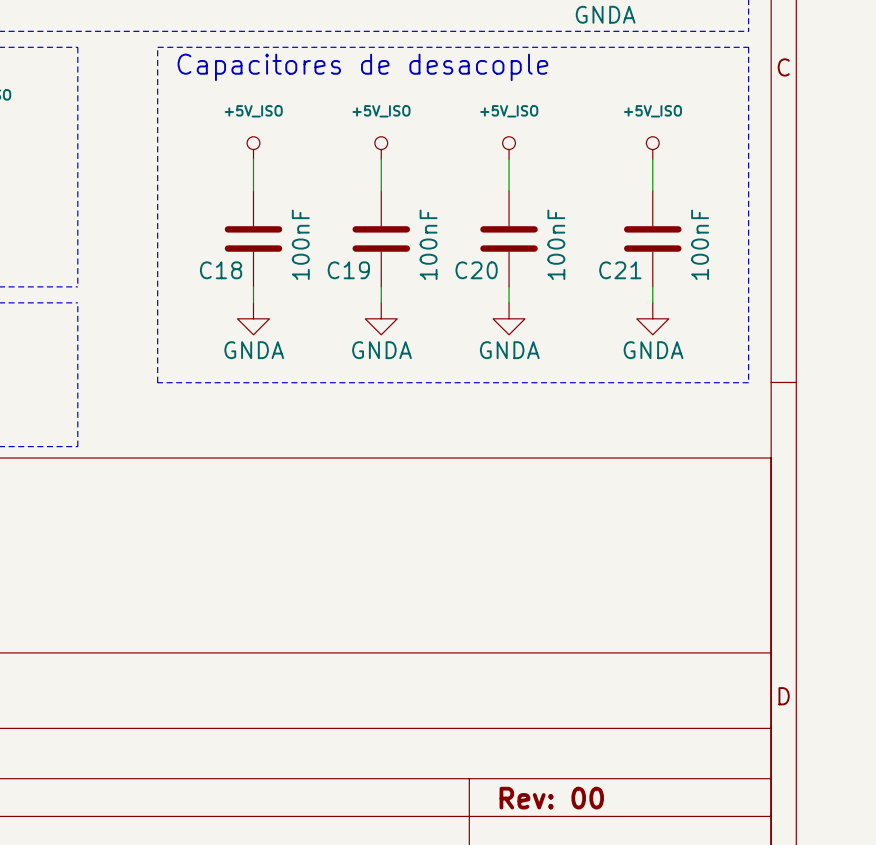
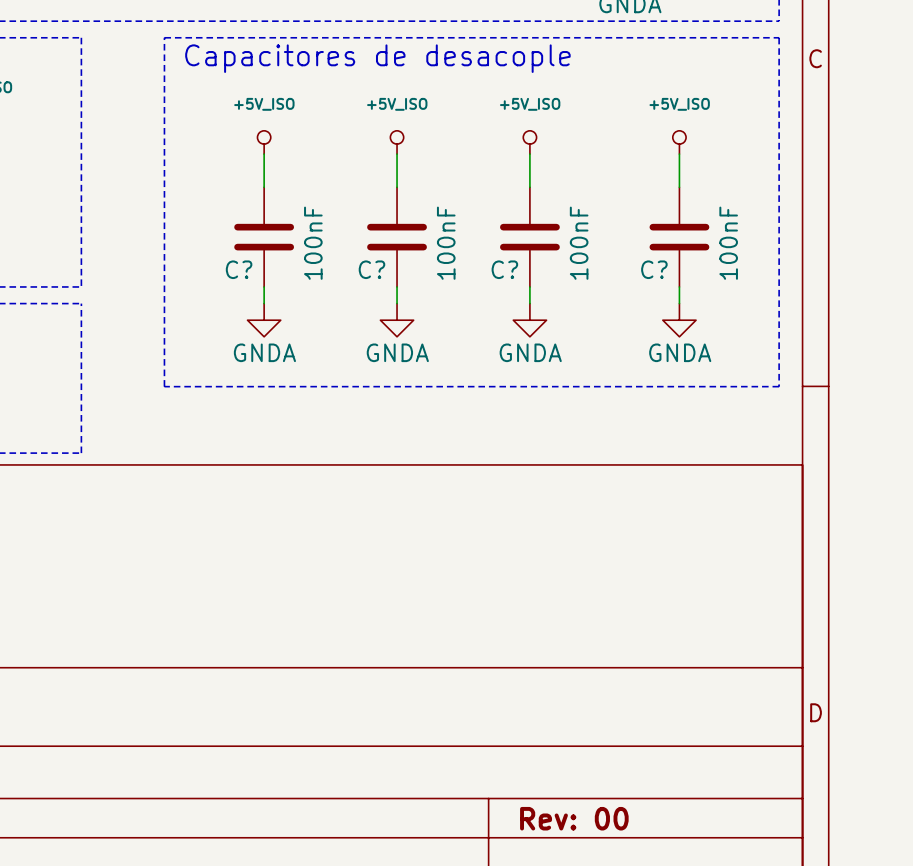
C18 name: C18 (221, 270) -> C? (239, 269)
C19 name: C19 (348, 270) -> C? (371, 269)
C20 name: C20 (476, 270) -> C? (504, 269)
C21 name: C21 (620, 270) -> C? (654, 269)

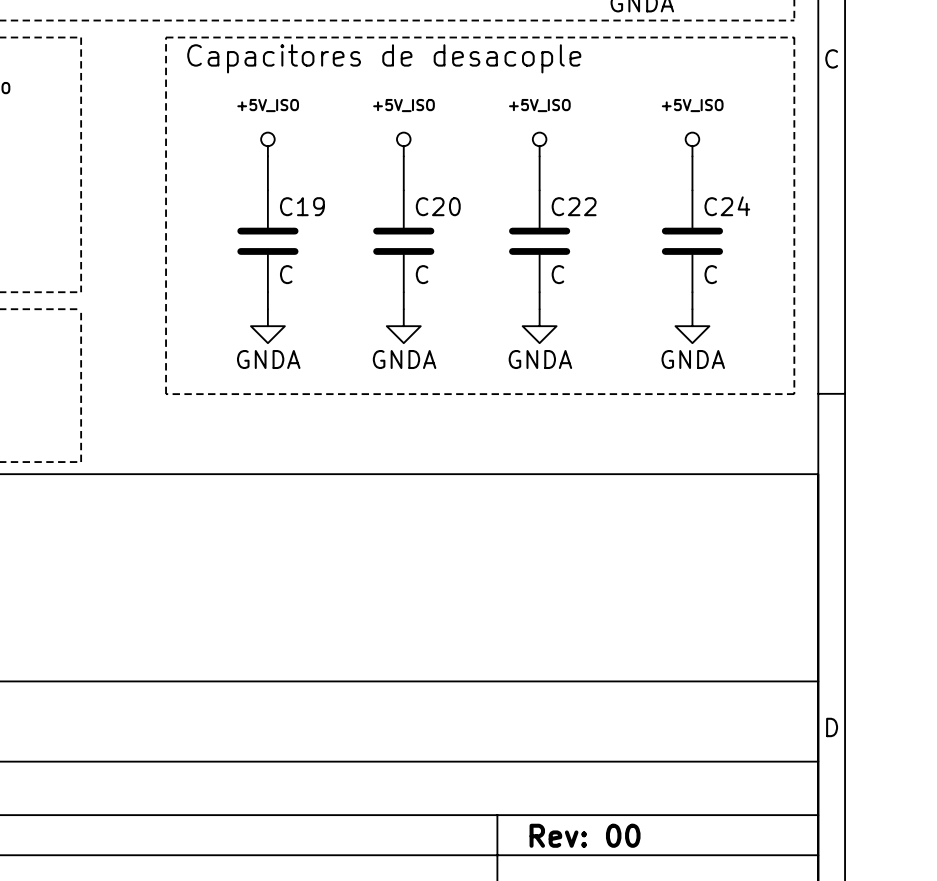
C? value: 100nF (313, 243) -> C (286, 274)
C? value: 100nF (446, 243) -> C (422, 274)
C? value: 100nF (579, 243) -> C (557, 274)
C? value: 100nF (728, 243) -> C (710, 274)
C? name: C? (239, 269) -> C19 (302, 206)
C? name: C? (371, 269) -> C20 (438, 206)
C? name: C? (504, 269) -> C22 (574, 206)
C? name: C? (654, 269) -> C24 (727, 206)

